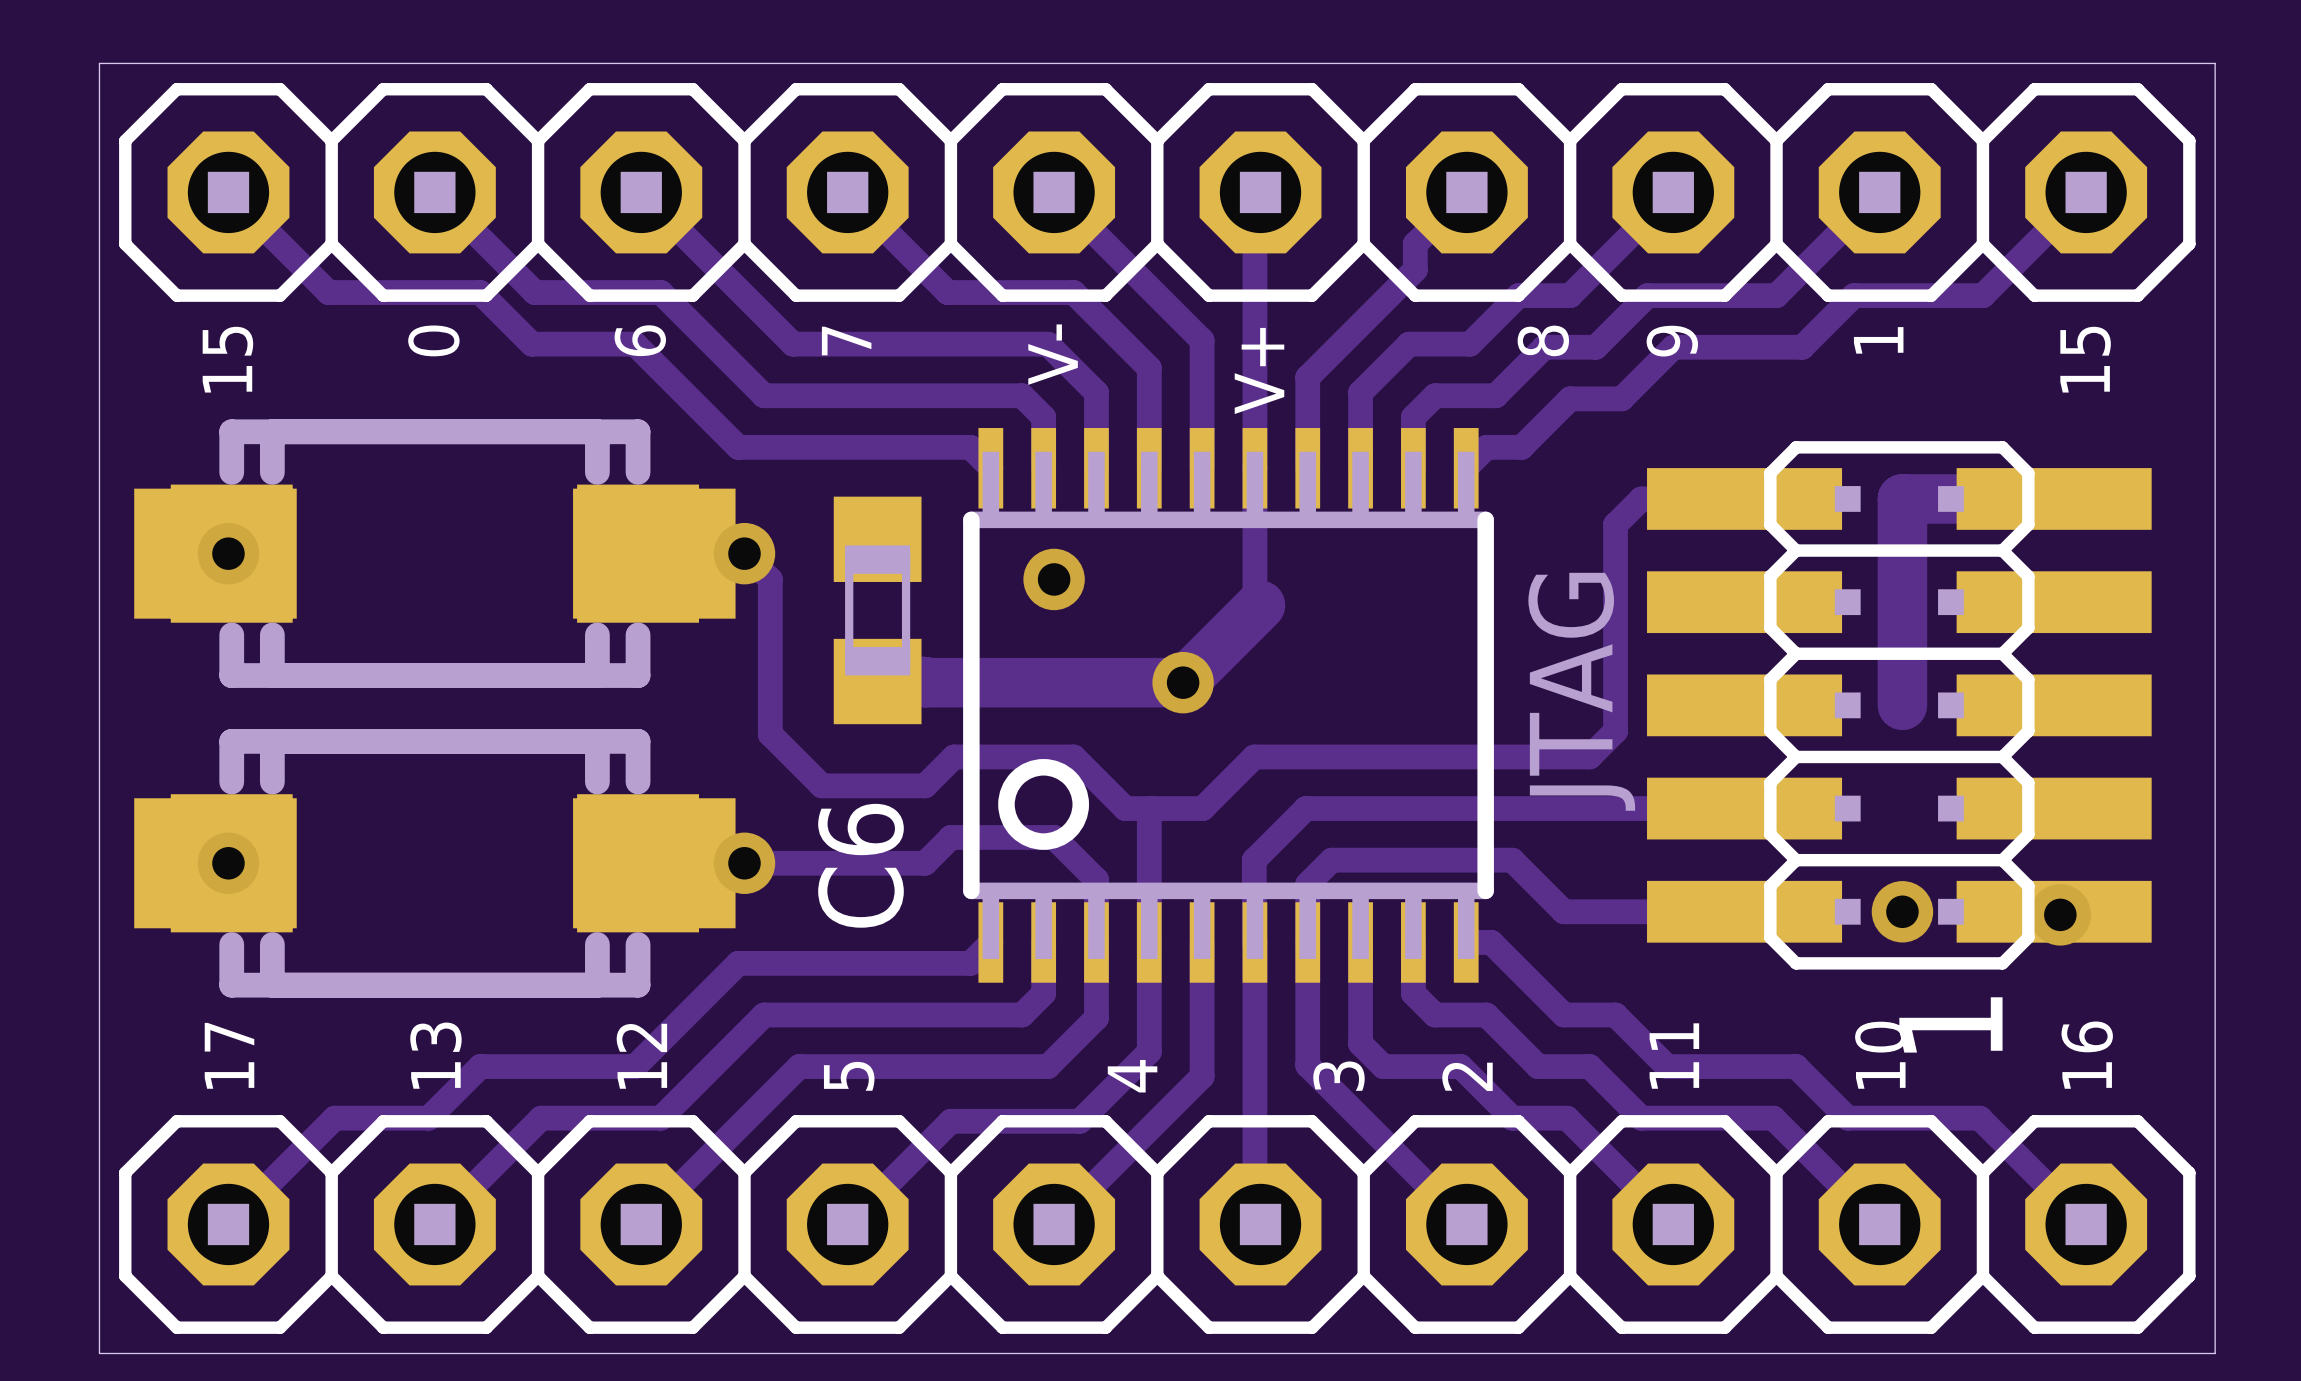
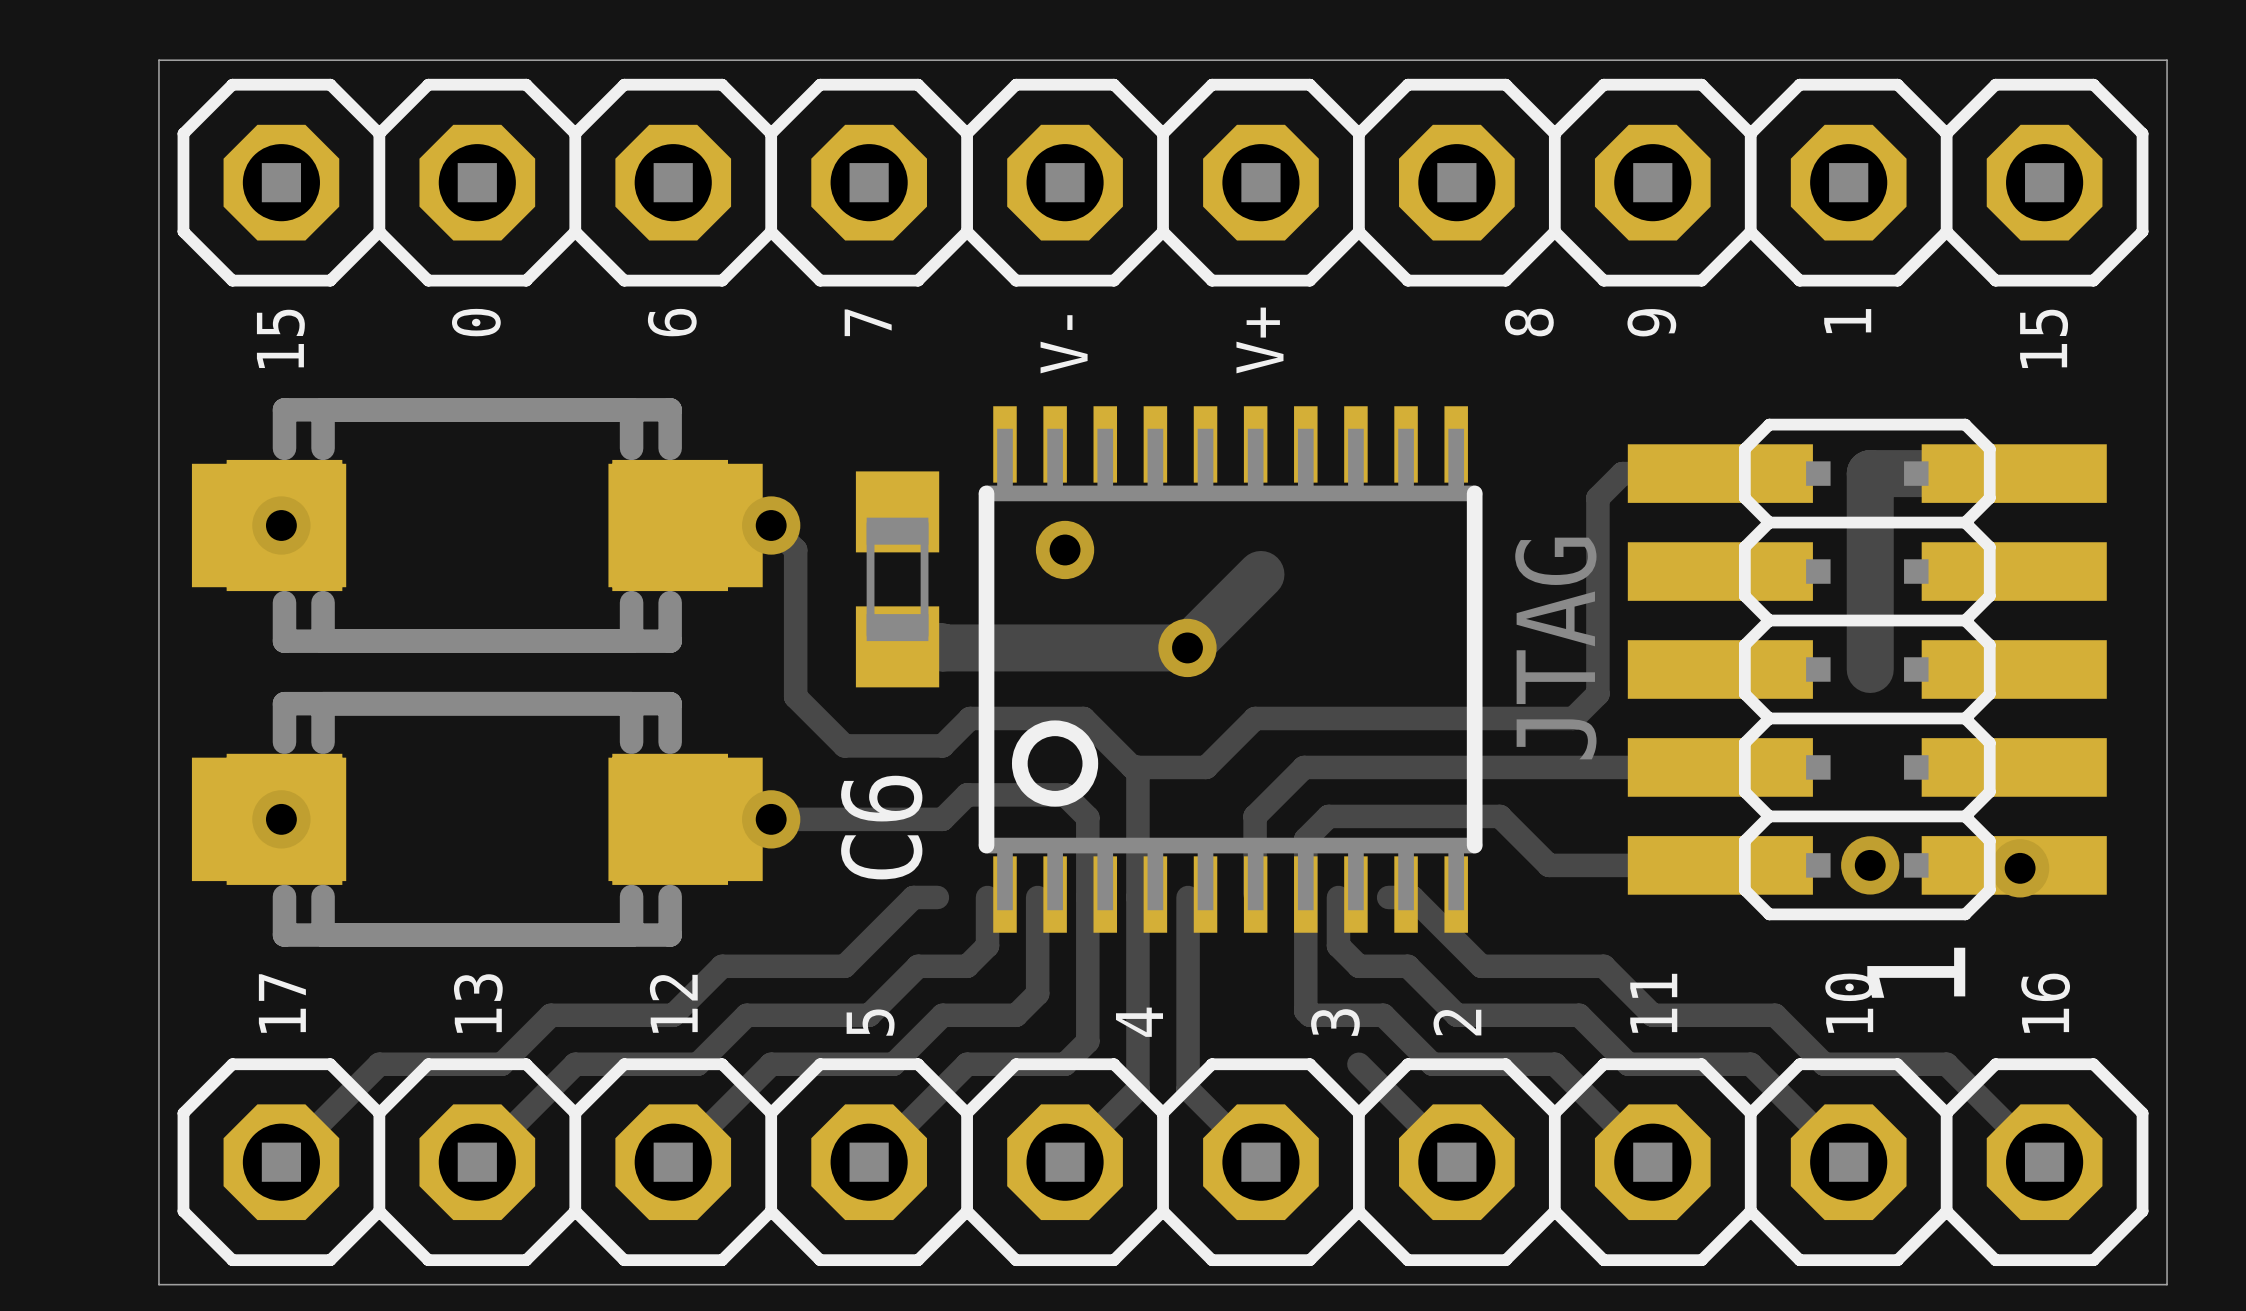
track: (228, 192) (328, 292) (480, 292) (531, 344) (635, 344) (738, 447) (970, 447) (990, 467) -> none
track: (434, 192) (534, 292) (660, 292) (764, 395) (1022, 395) (1043, 417) (1043, 468) -> none
track: (641, 192) (793, 344) (1047, 344) (1096, 392) (1096, 468) -> none
track: (847, 192) (947, 292) (1073, 292) (1149, 368) (1149, 468) -> none
track: (1054, 192) (1202, 340) (1202, 468) -> none
track: (1260, 192) (1254, 198) (1254, 599) -> none
track: (1466, 192) (1415, 244) (1415, 269) (1307, 377) (1307, 468) -> none
track: (1673, 192) (1570, 295) (1518, 295) (1470, 344) (1409, 344) (1360, 392) (1360, 468) -> none
track: (1879, 192) (1776, 295) (1647, 295) (1595, 347) (1544, 347) (1495, 395) (1434, 395) (1413, 417) (1413, 468) -> none
track: (2086, 192) (1982, 295) (1853, 295) (1802, 347) (1673, 347) (1621, 398) (1570, 398) (1521, 447) (1486, 447) (1466, 467) -> none
track: (1151, 808) (1149, 810) (1149, 1051) (1079, 1121) (1054, 1121) -> (1087, 817) (1087, 1041) (1065, 1064)
track: (1078, 861) (1096, 879) (1096, 1018) (1047, 1066) (799, 1066) (744, 1121) -> (1037, 897) (1037, 993) (1016, 1015) (942, 1015) (893, 1064) (771, 1064)
track: (1043, 942) (1043, 993) (1022, 1014) (764, 1014) (660, 1118) (541, 1118) (538, 1121) -> (987, 897) (987, 945) (967, 966) (918, 966) (869, 1015) (746, 1015) (697, 1064) (575, 1064)
track: (1202, 942) (1202, 1076) (1130, 1147) -> (1137, 767) (1137, 1089)
track: (1254, 942) (1254, 1218) -> (1188, 897) (1188, 1089) (1255, 1156)
track: (1360, 942) (1360, 1043) (1383, 1066) (1460, 1066) (1512, 1118) (1567, 1118) (1570, 1121) -> (1309, 1015) (1383, 1015) (1432, 1064) (1554, 1064)
track: (1413, 942) (1413, 993) (1434, 1014) (1486, 1014) (1538, 1066) (1589, 1066) (1641, 1118) (1773, 1118) (1776, 1121) -> (1338, 897) (1338, 945) (1358, 966) (1407, 966) (1456, 1015) (1579, 1015) (1628, 1064) (1750, 1064)
track: (1466, 942) (1491, 942) (1563, 1014) (1615, 1014) (1667, 1066) (1796, 1066) (1847, 1118) (1979, 1118) (1982, 1121) -> (1388, 897) (1412, 897) (1481, 966) (1603, 966) (1652, 1015) (1775, 1015) (1824, 1064) (1946, 1064)
track: (990, 943) (970, 963) (738, 963) (635, 1066) (480, 1066) (428, 1118) (334, 1118) (331, 1121) -> (937, 897) (913, 897) (844, 966) (722, 966) (673, 1015) (550, 1015) (501, 1064) (379, 1064)
track: (1312, 1069) (1363, 1121) -> none

